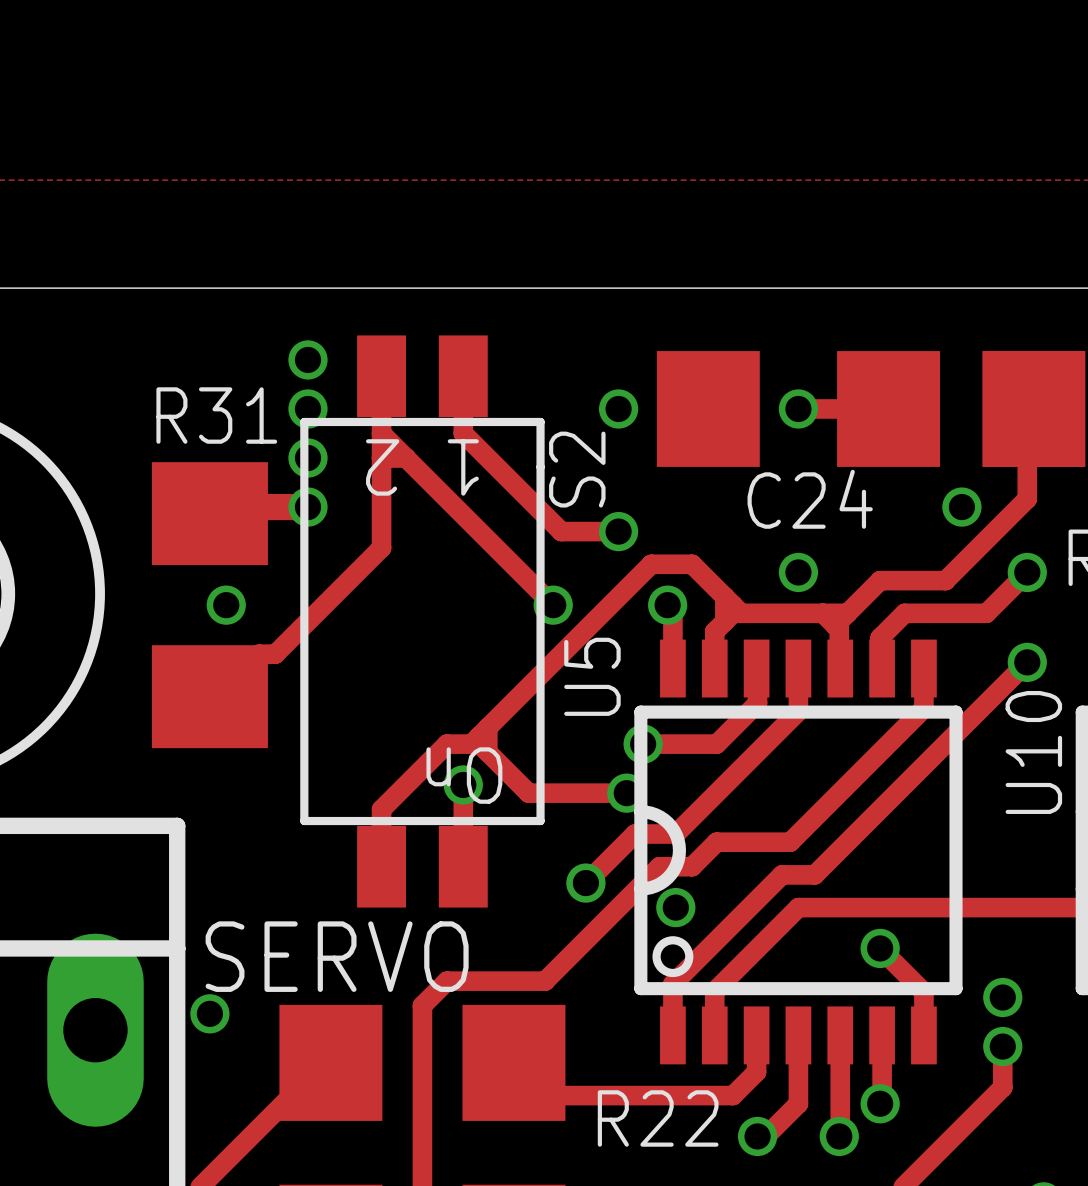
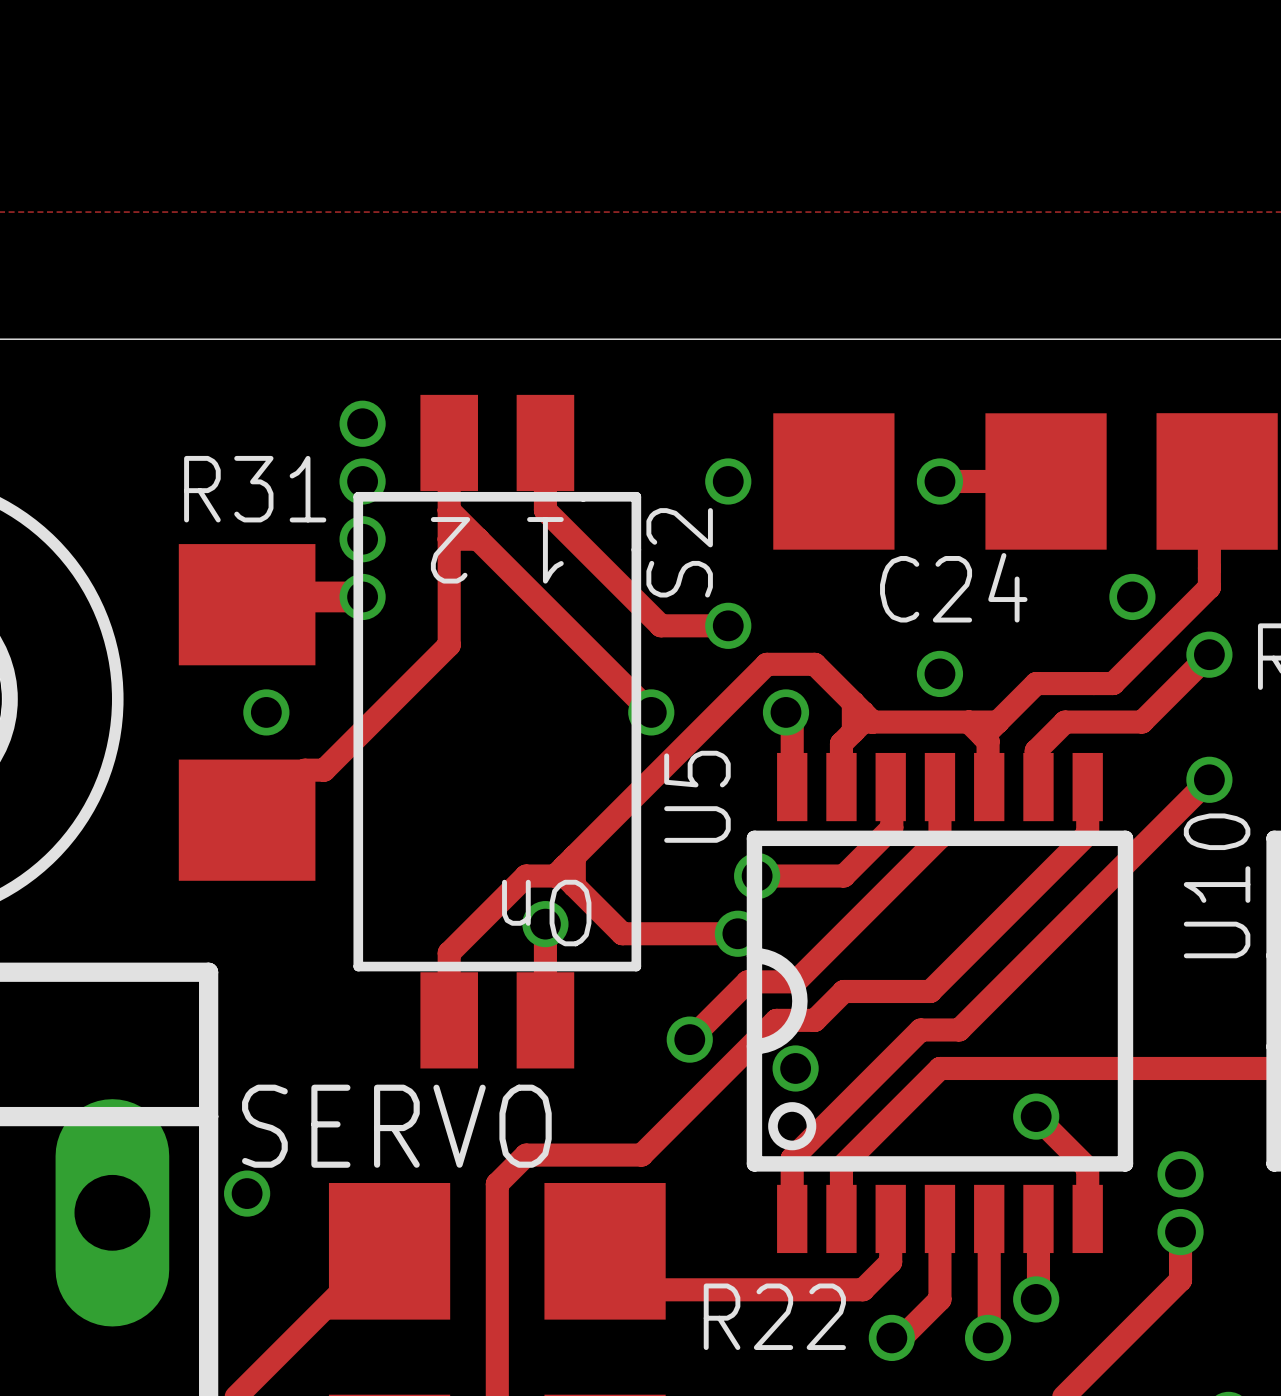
track: (1027, 572) (986, 613) (970, 613) -> (1209, 654) (1142, 722)
via position: (1027, 572) -> (1209, 654)

